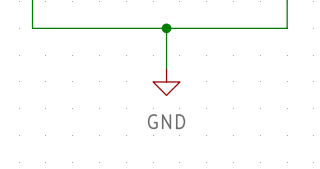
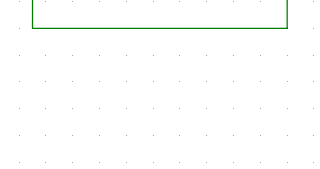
wire: (166, 28) (166, 68) -> none
junction: (166, 28) -> none
power symbol: GND (166, 81) -> none

